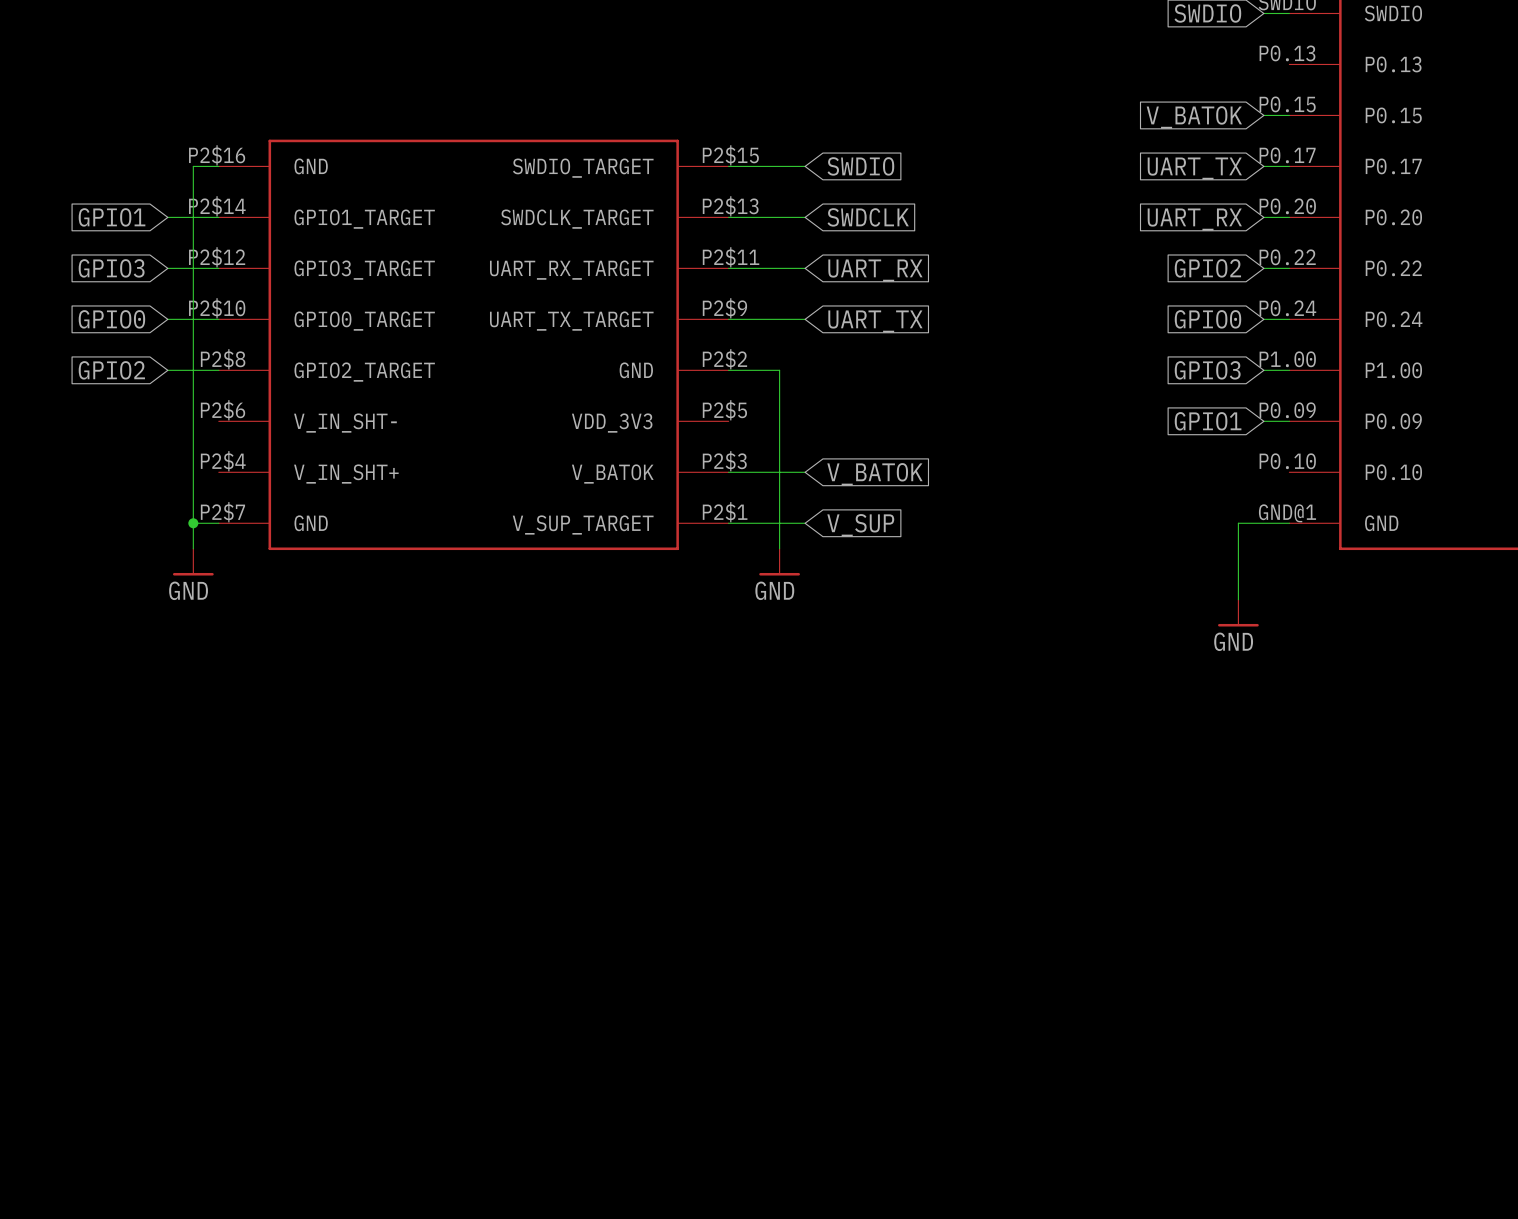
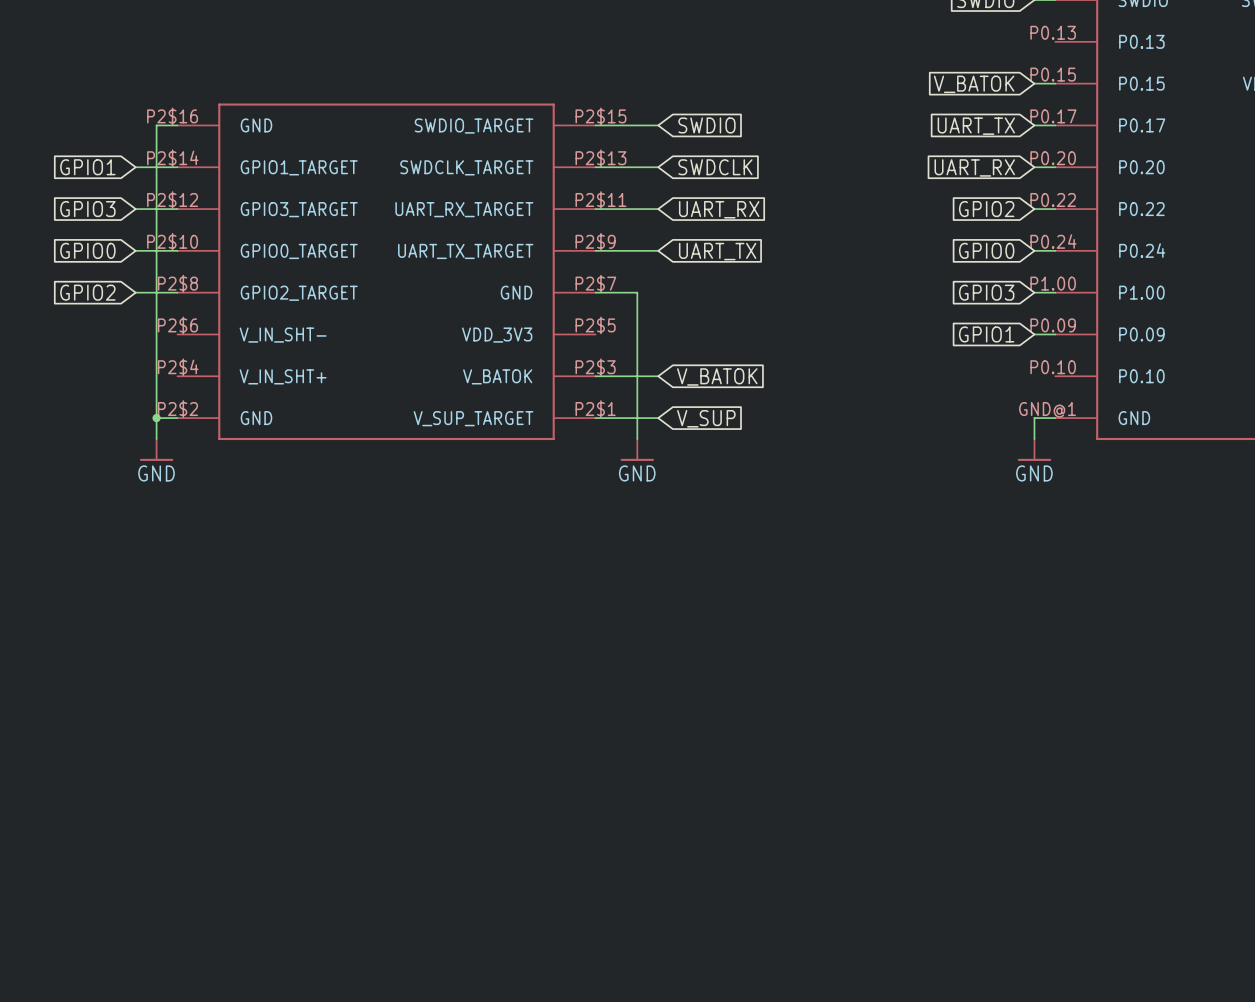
part pin number: P2$2 (724, 359) -> P2$7 (595, 283)
part pin number: P2$7 (222, 512) -> P2$2 (177, 409)
wire: (1263, 523) (1238, 523) (1238, 599) -> (1034, 418) (1034, 438)
power symbol position: GND (1238, 613) -> GND (1034, 449)

